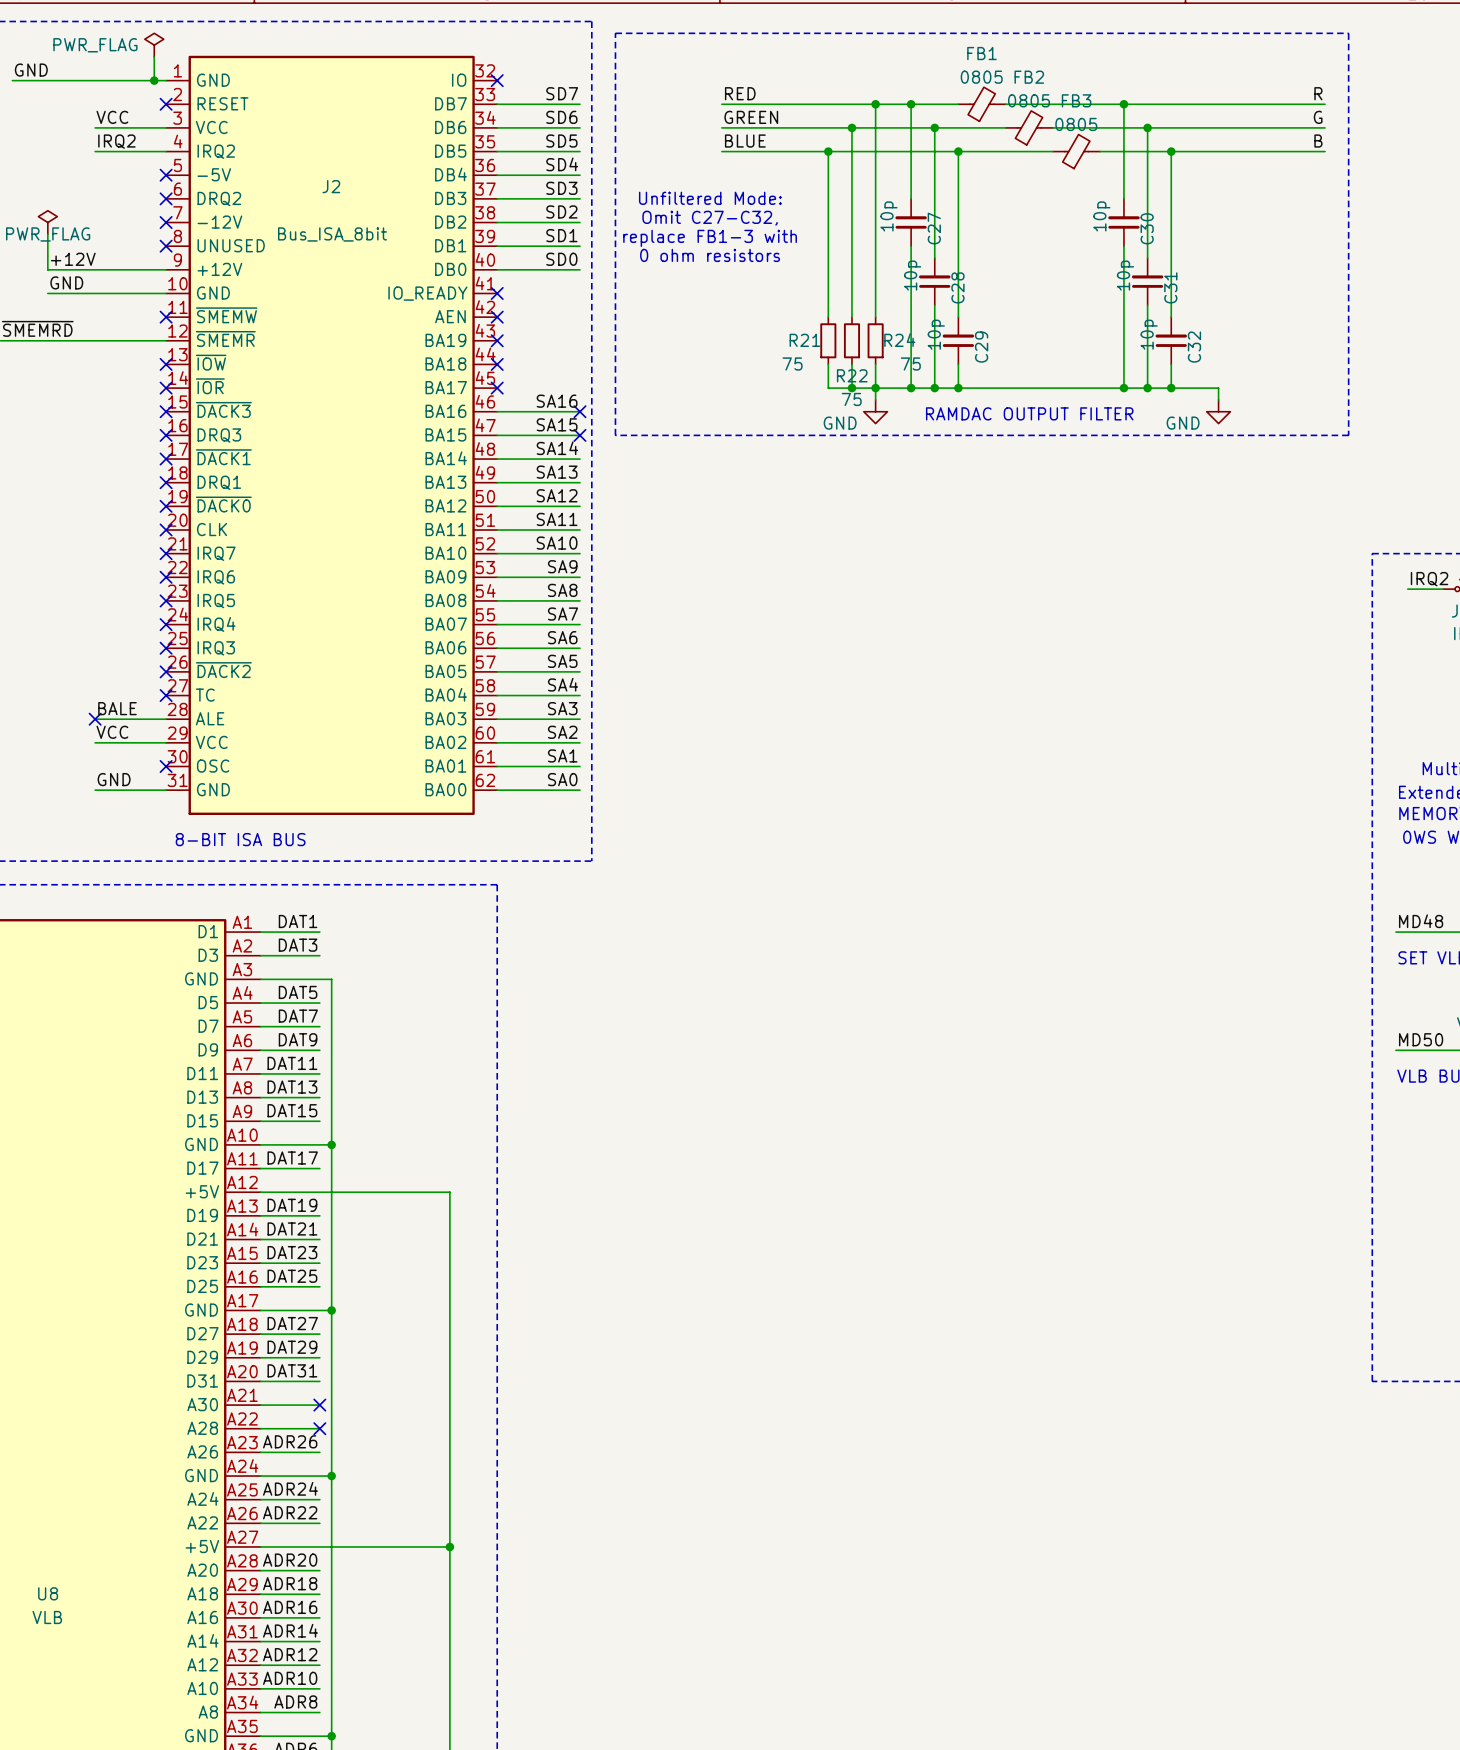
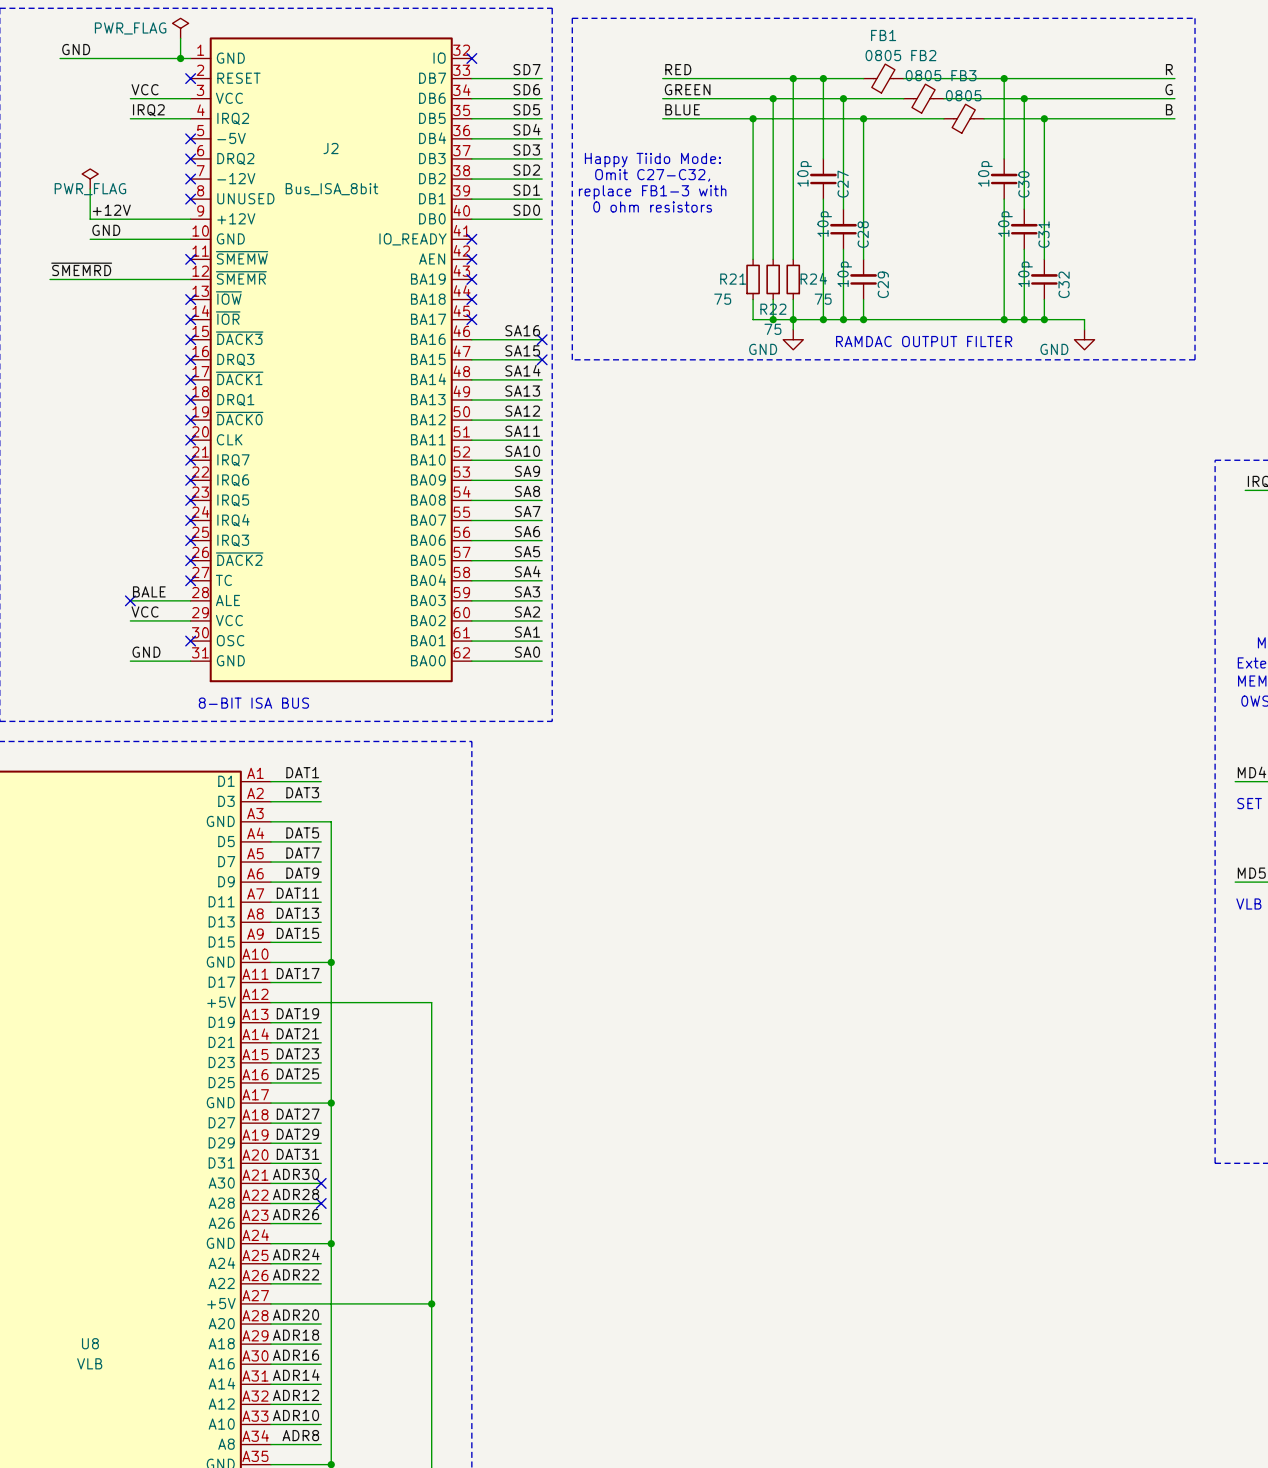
text: Unfiltered Mode: (710, 198) -> Happy Tiido Mode: (652, 160)
label: none -> ADR30 (296, 1174)
label: none -> ADR28 (296, 1194)

